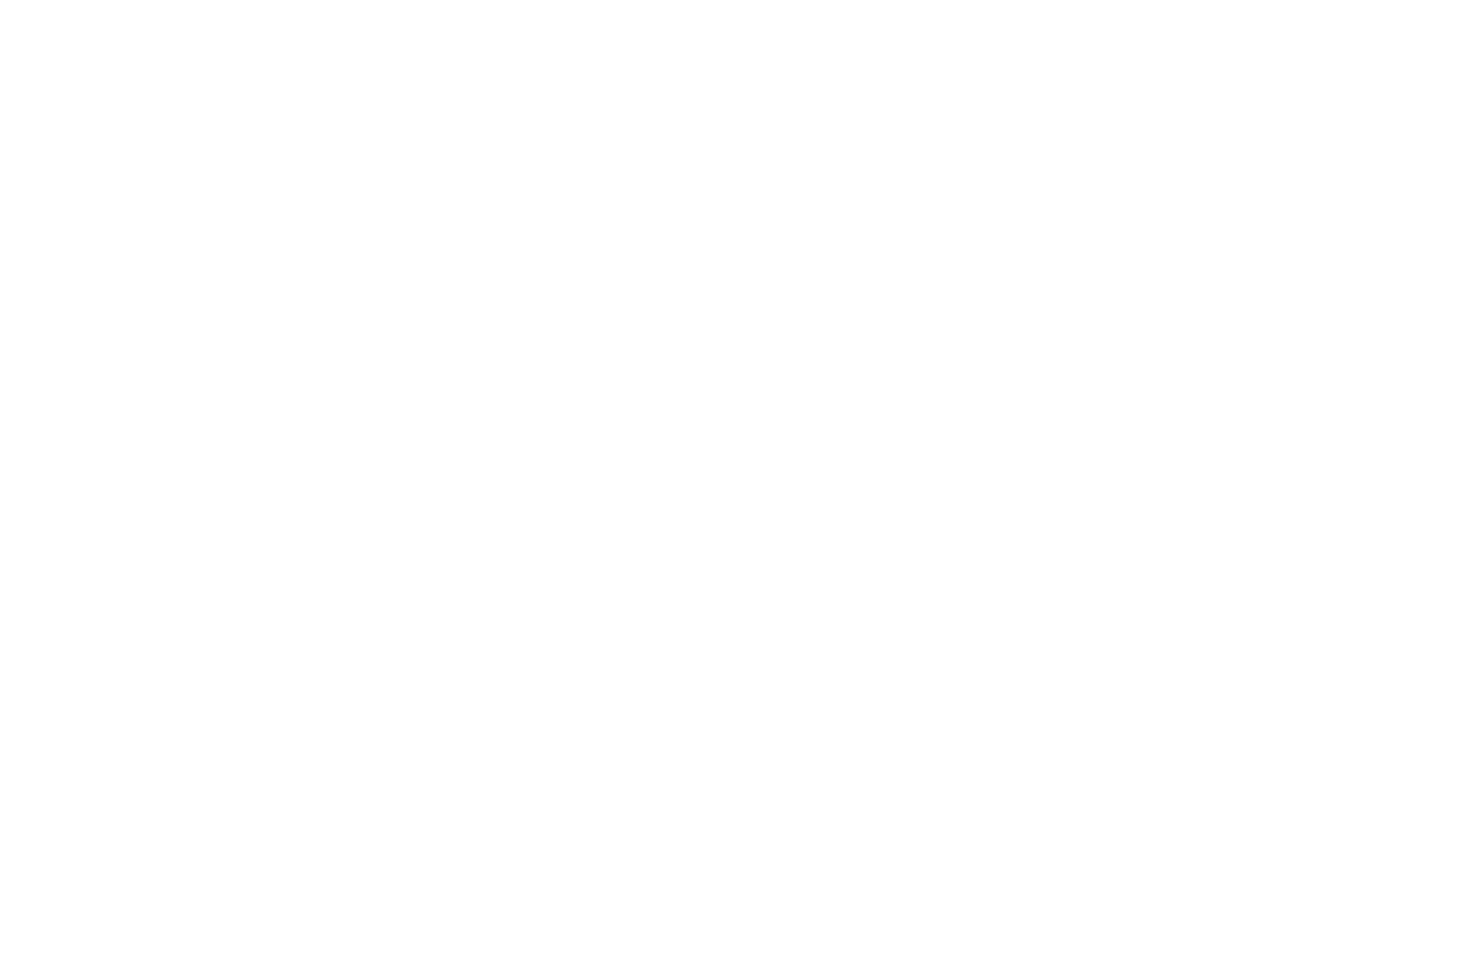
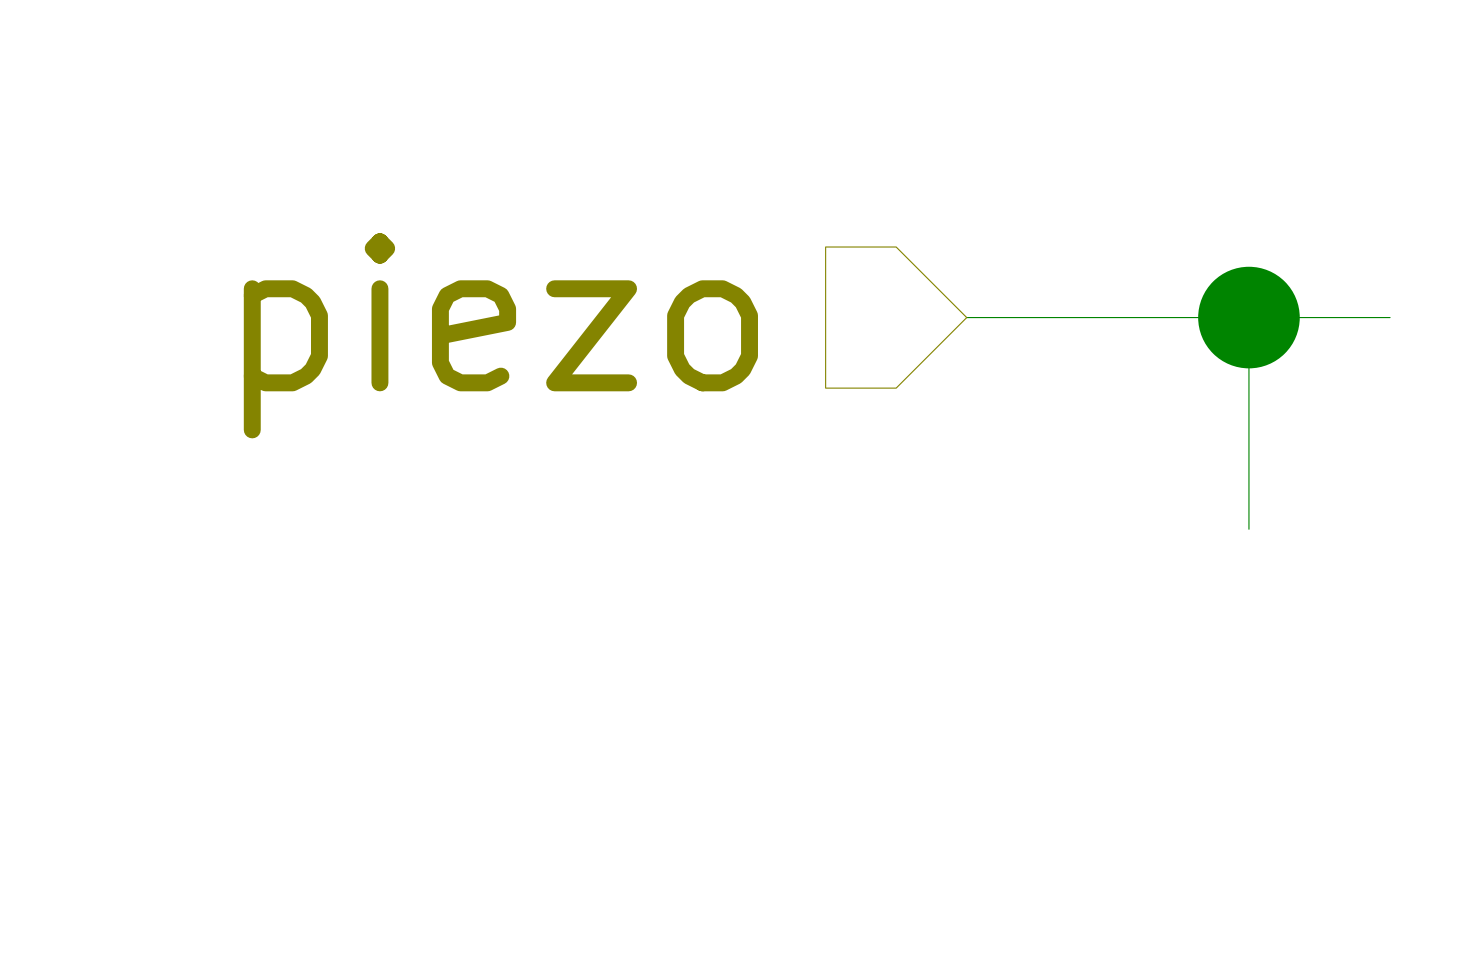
wire: none -> (966, 317) (1390, 317)
wire: none -> (1248, 317) (1248, 529)
junction: none -> (1248, 317)
hierarchical label: none -> piezo (500, 335)

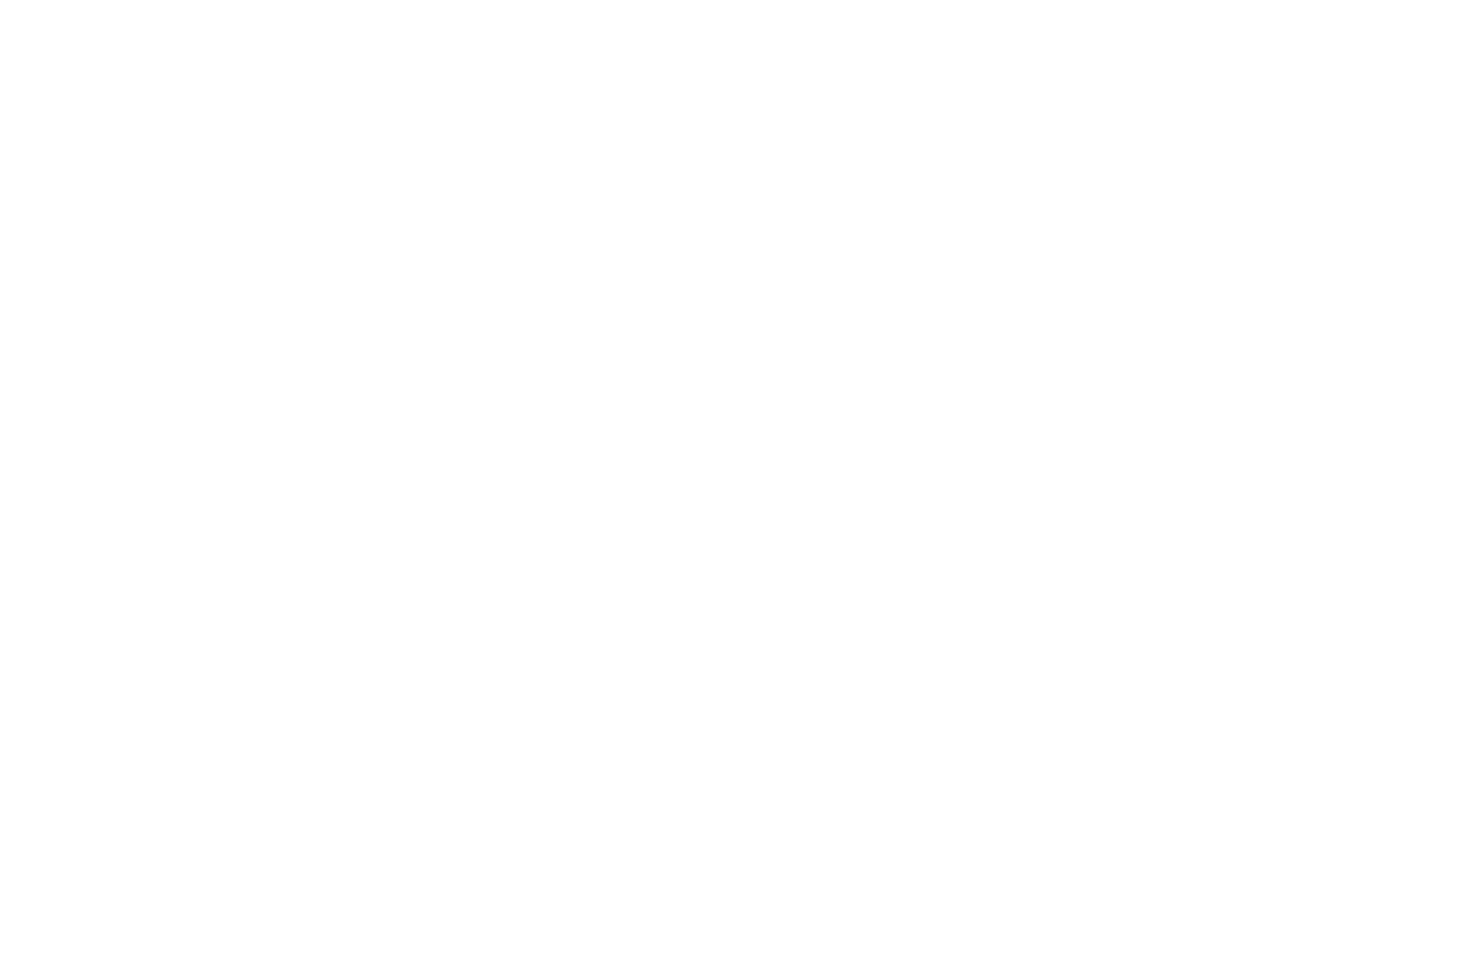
wire: (966, 317) (1390, 317) -> none
wire: (1248, 317) (1248, 529) -> none
junction: (1248, 317) -> none
hierarchical label: piezo (500, 335) -> none

